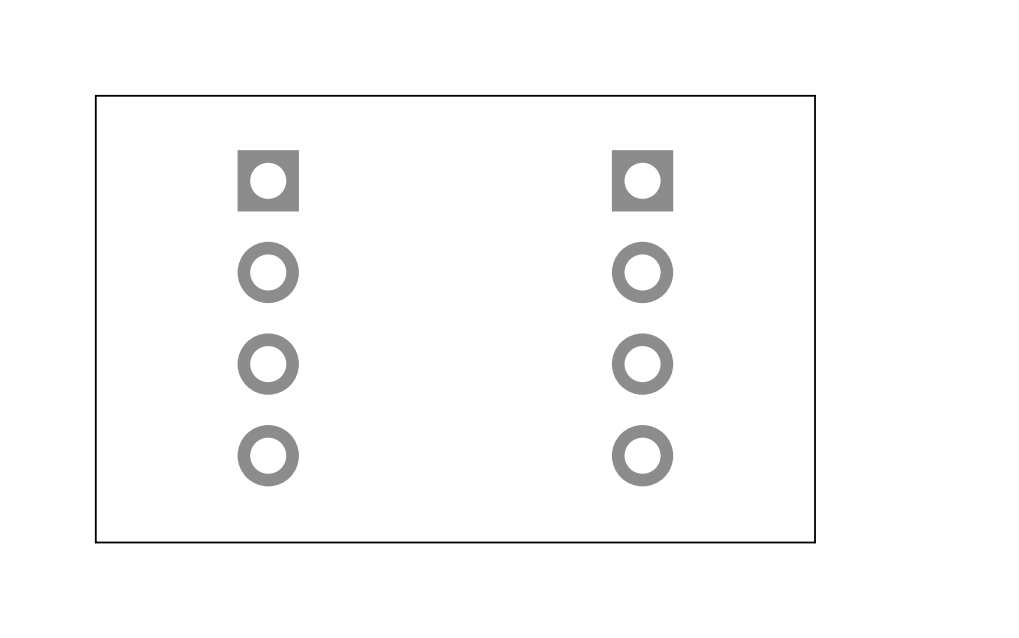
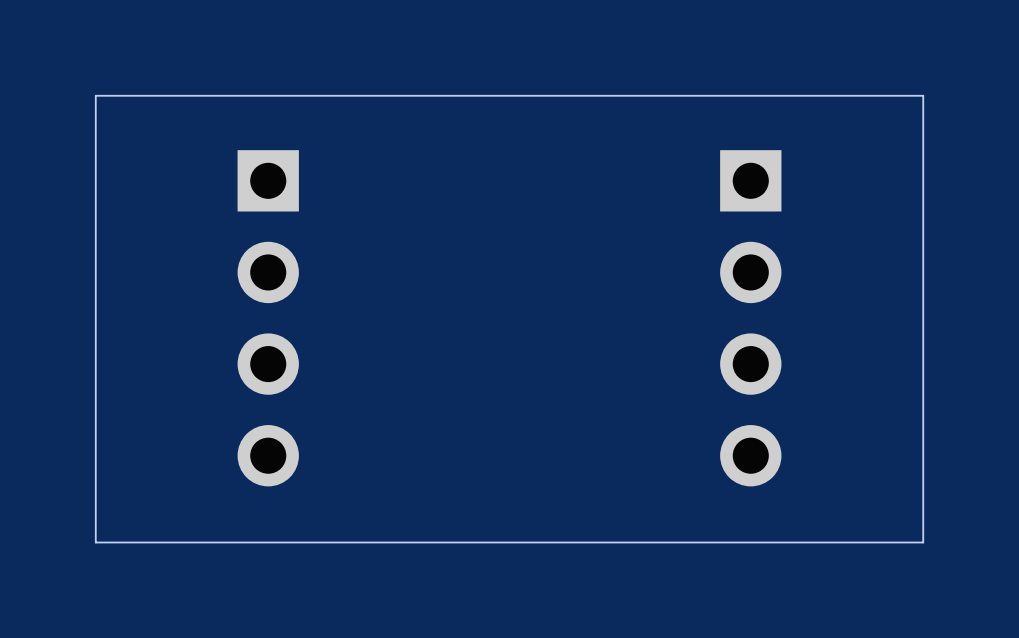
board edge: (815, 95) (815, 542) -> (815, 95) (923, 95) (923, 542) (815, 542)
part position: (642, 318) -> (750, 318)

